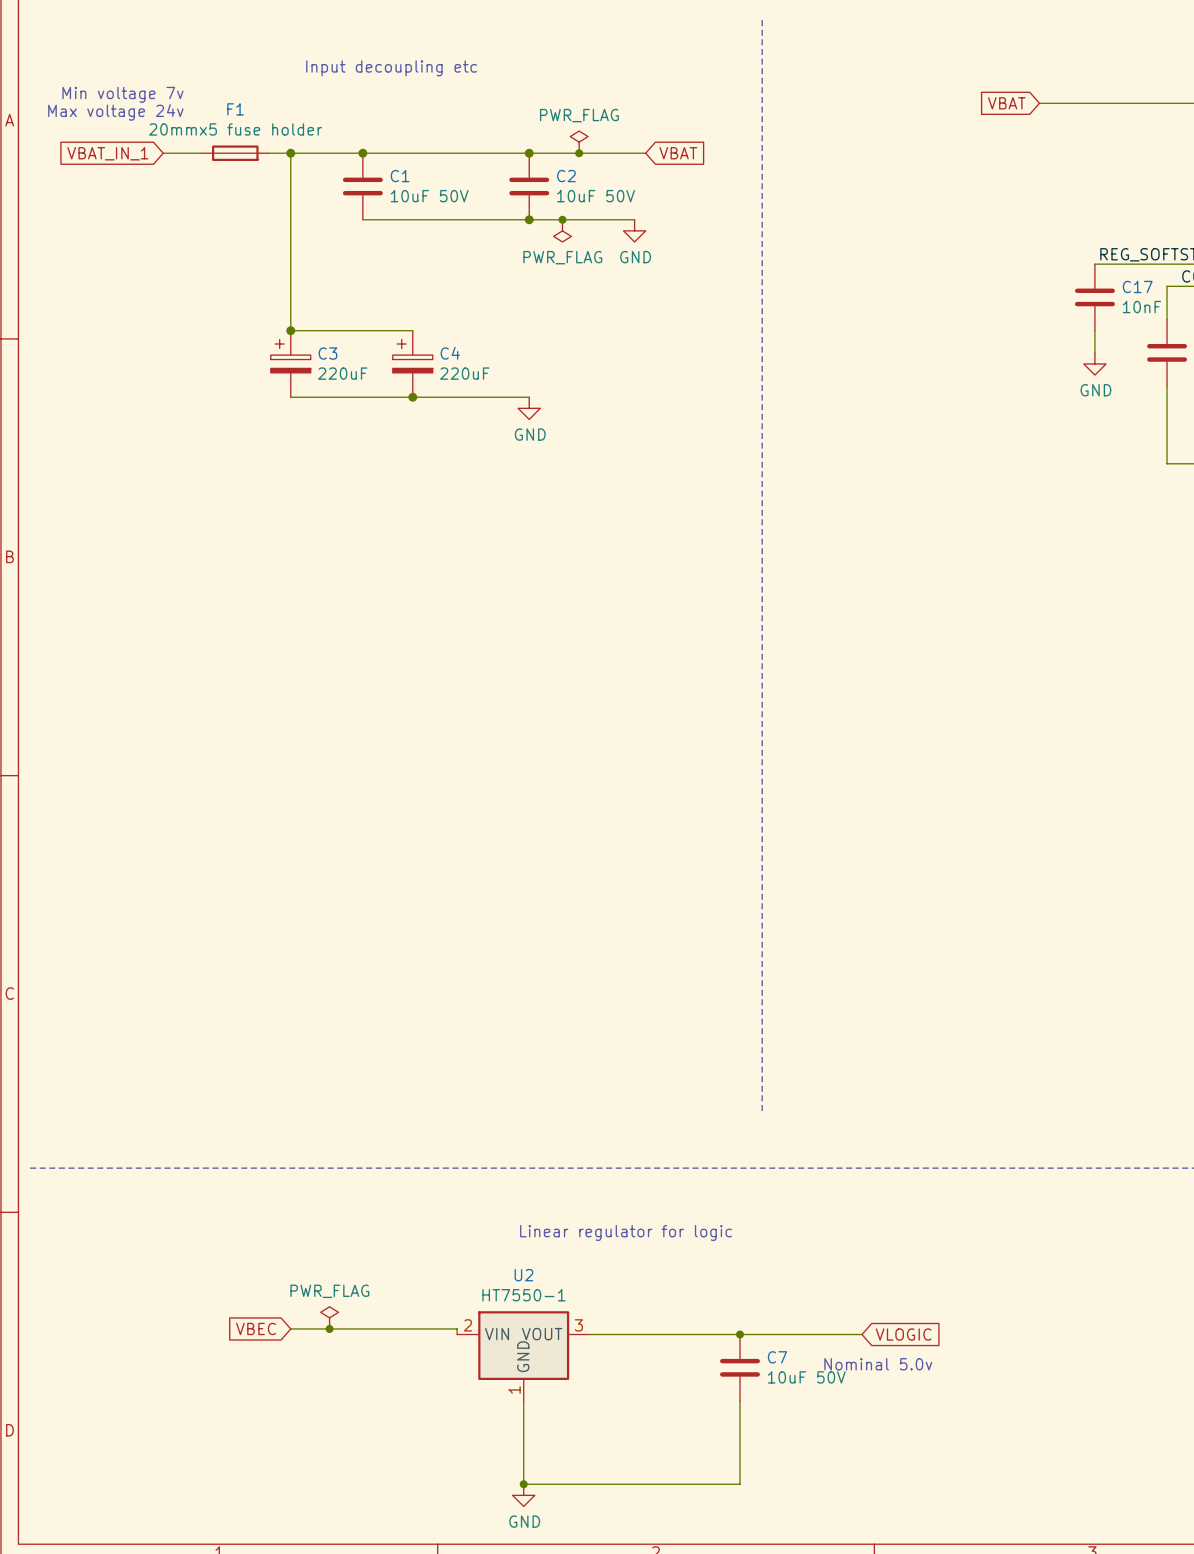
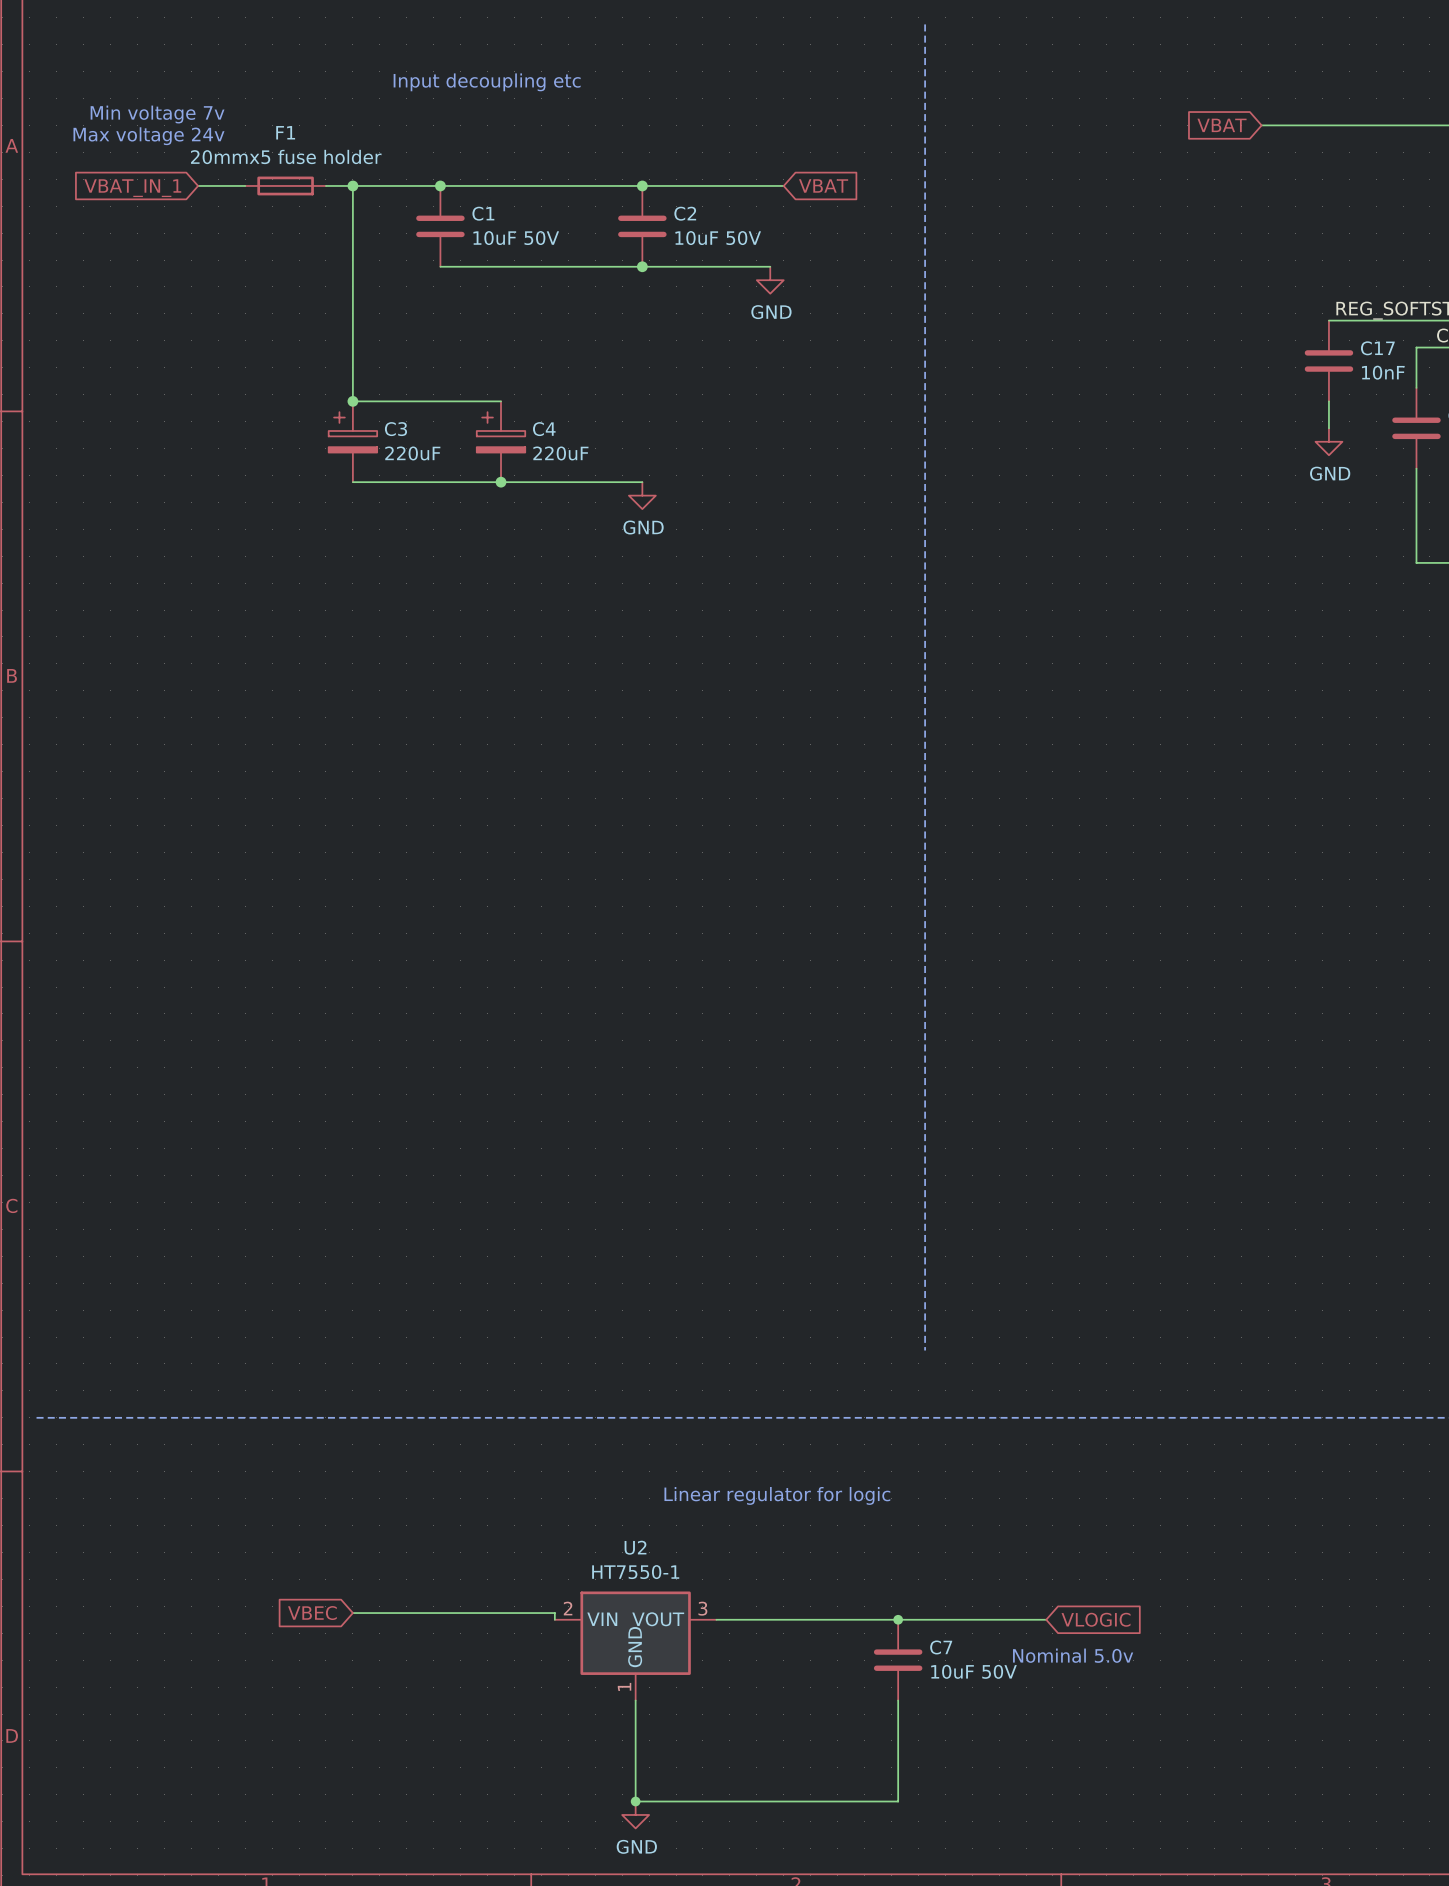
power symbol: PWR_FLAG (579, 142) -> none
junction: (579, 153) -> none
junction: (562, 219) -> none
power symbol: PWR_FLAG (562, 230) -> none
power symbol: PWR_FLAG (329, 1317) -> none
junction: (329, 1328) -> none

